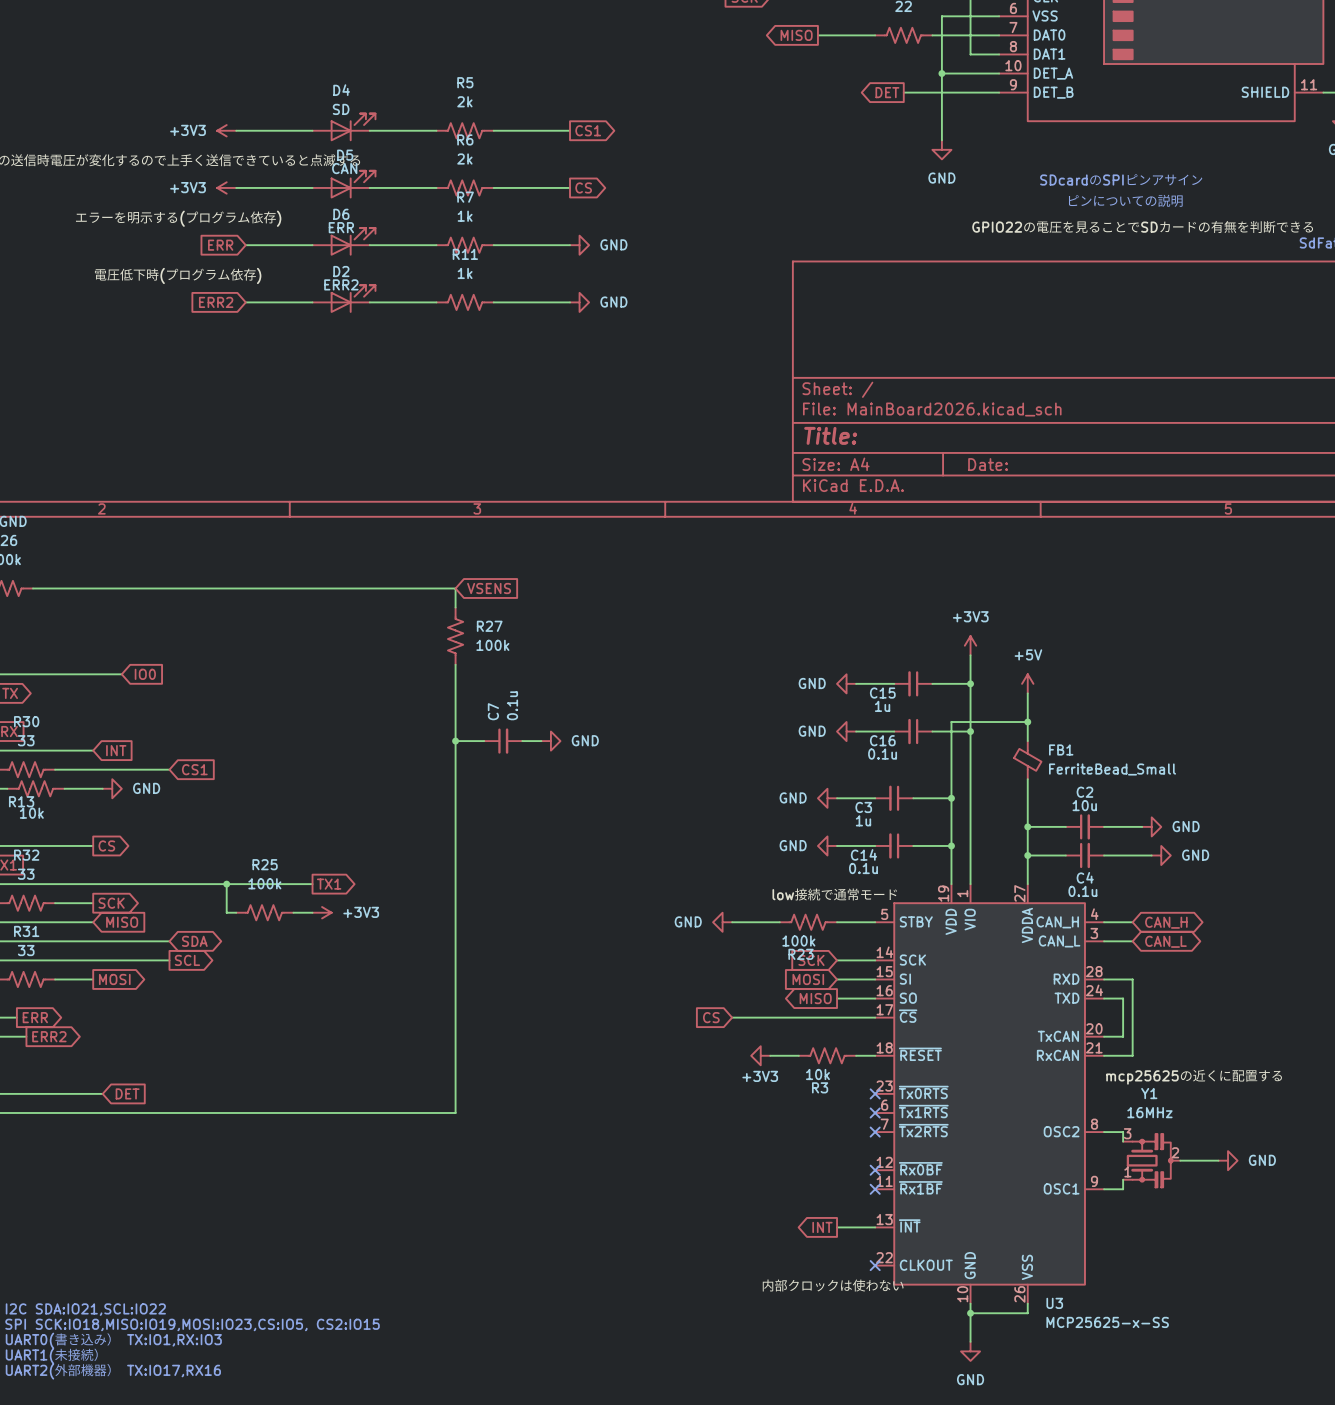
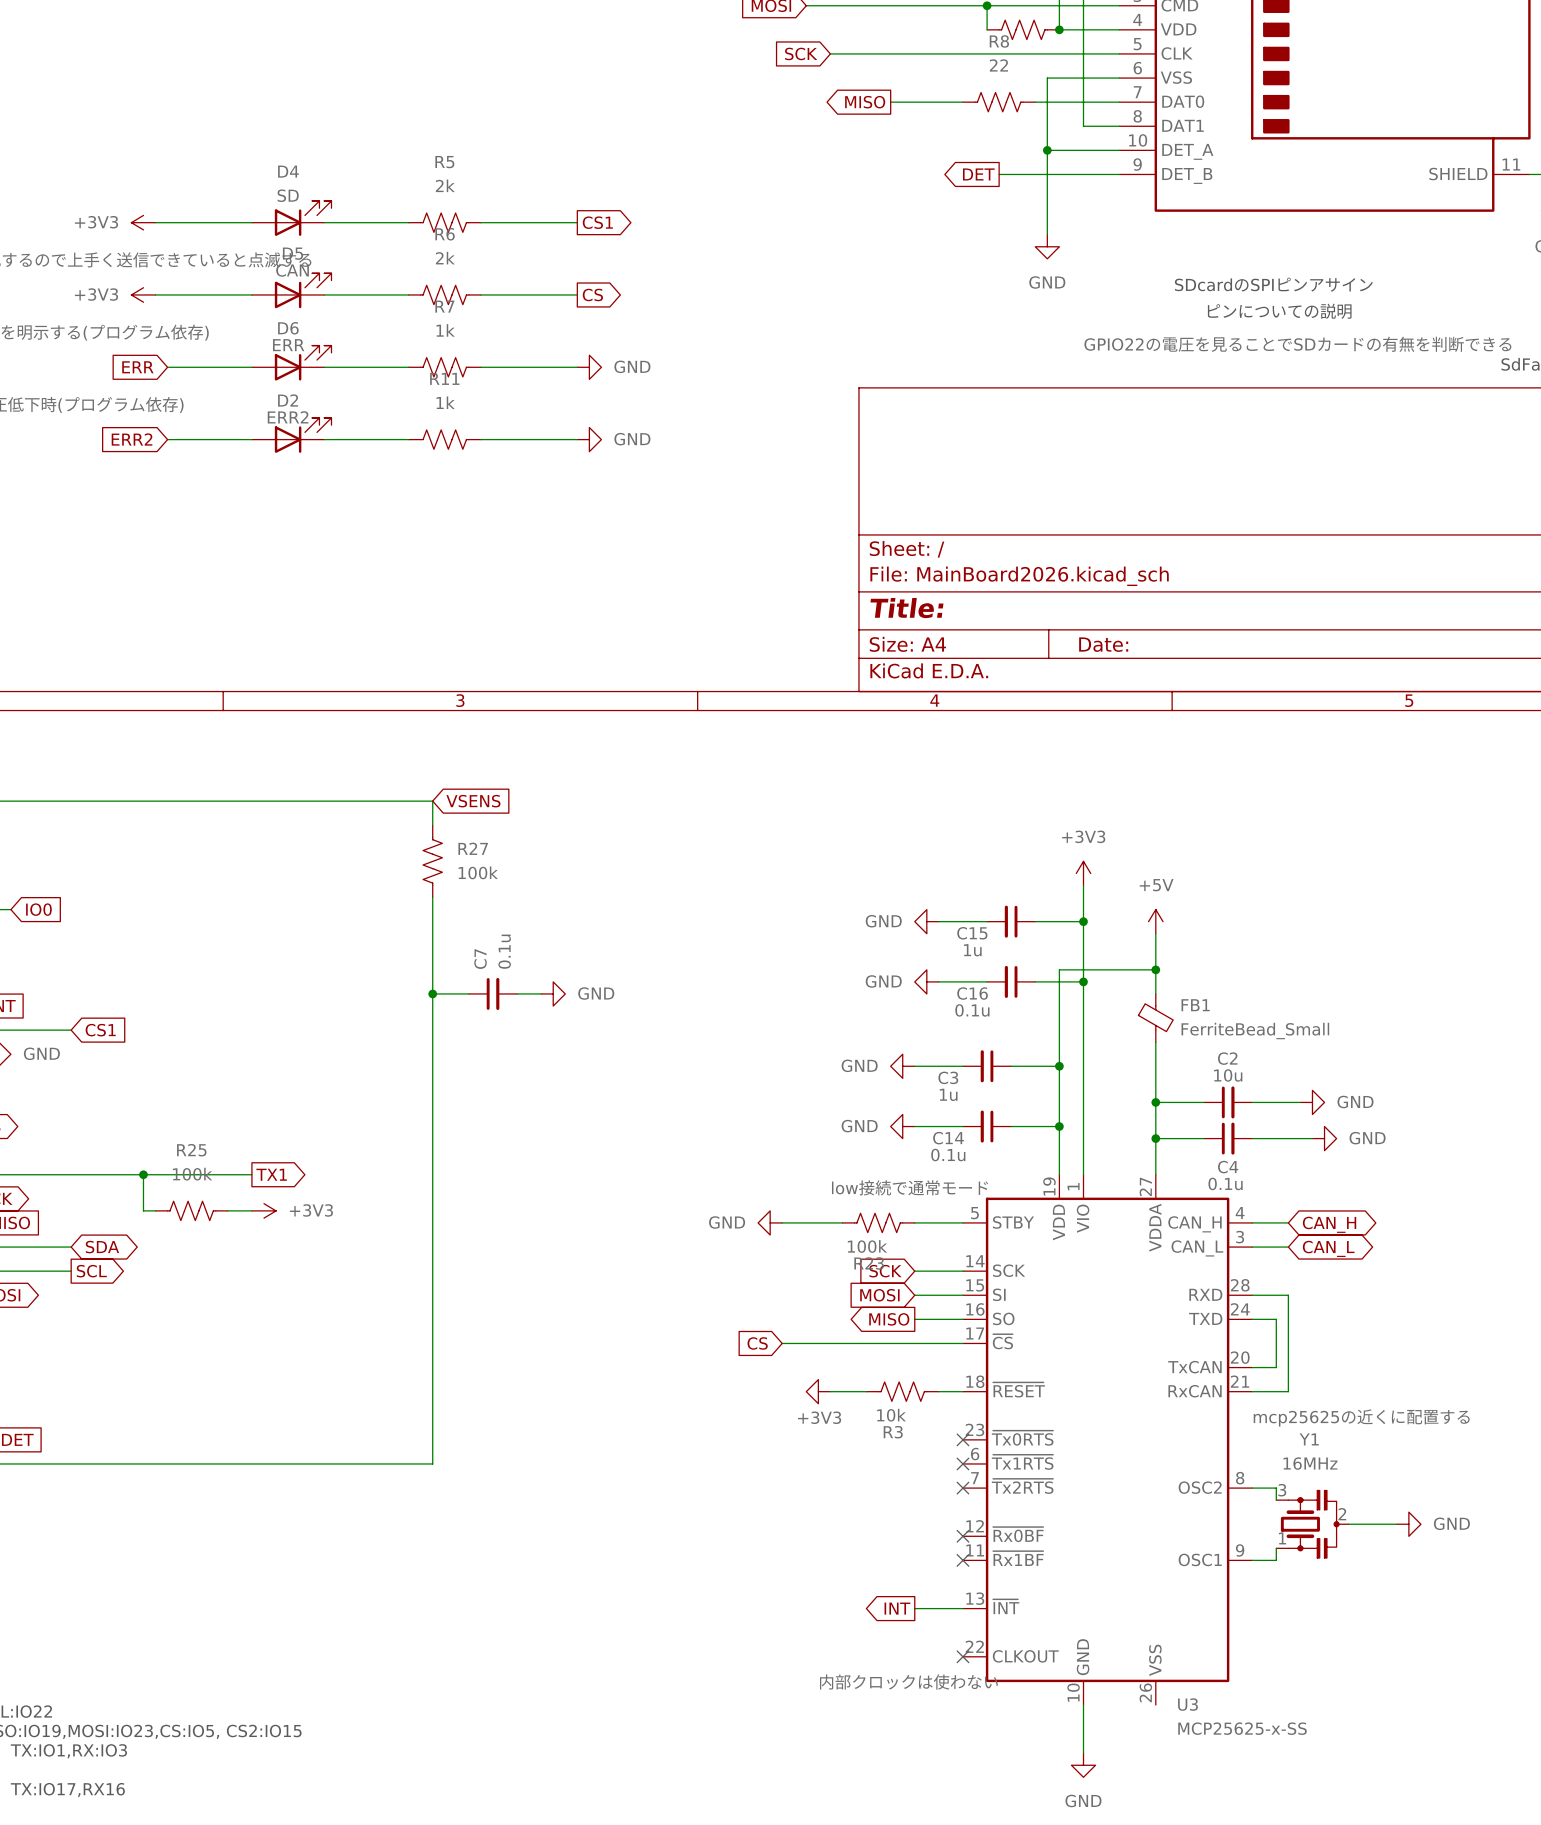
wire: (1027, 1303) (1027, 1313) (970, 1313) -> none
junction: (970, 1313) -> none

